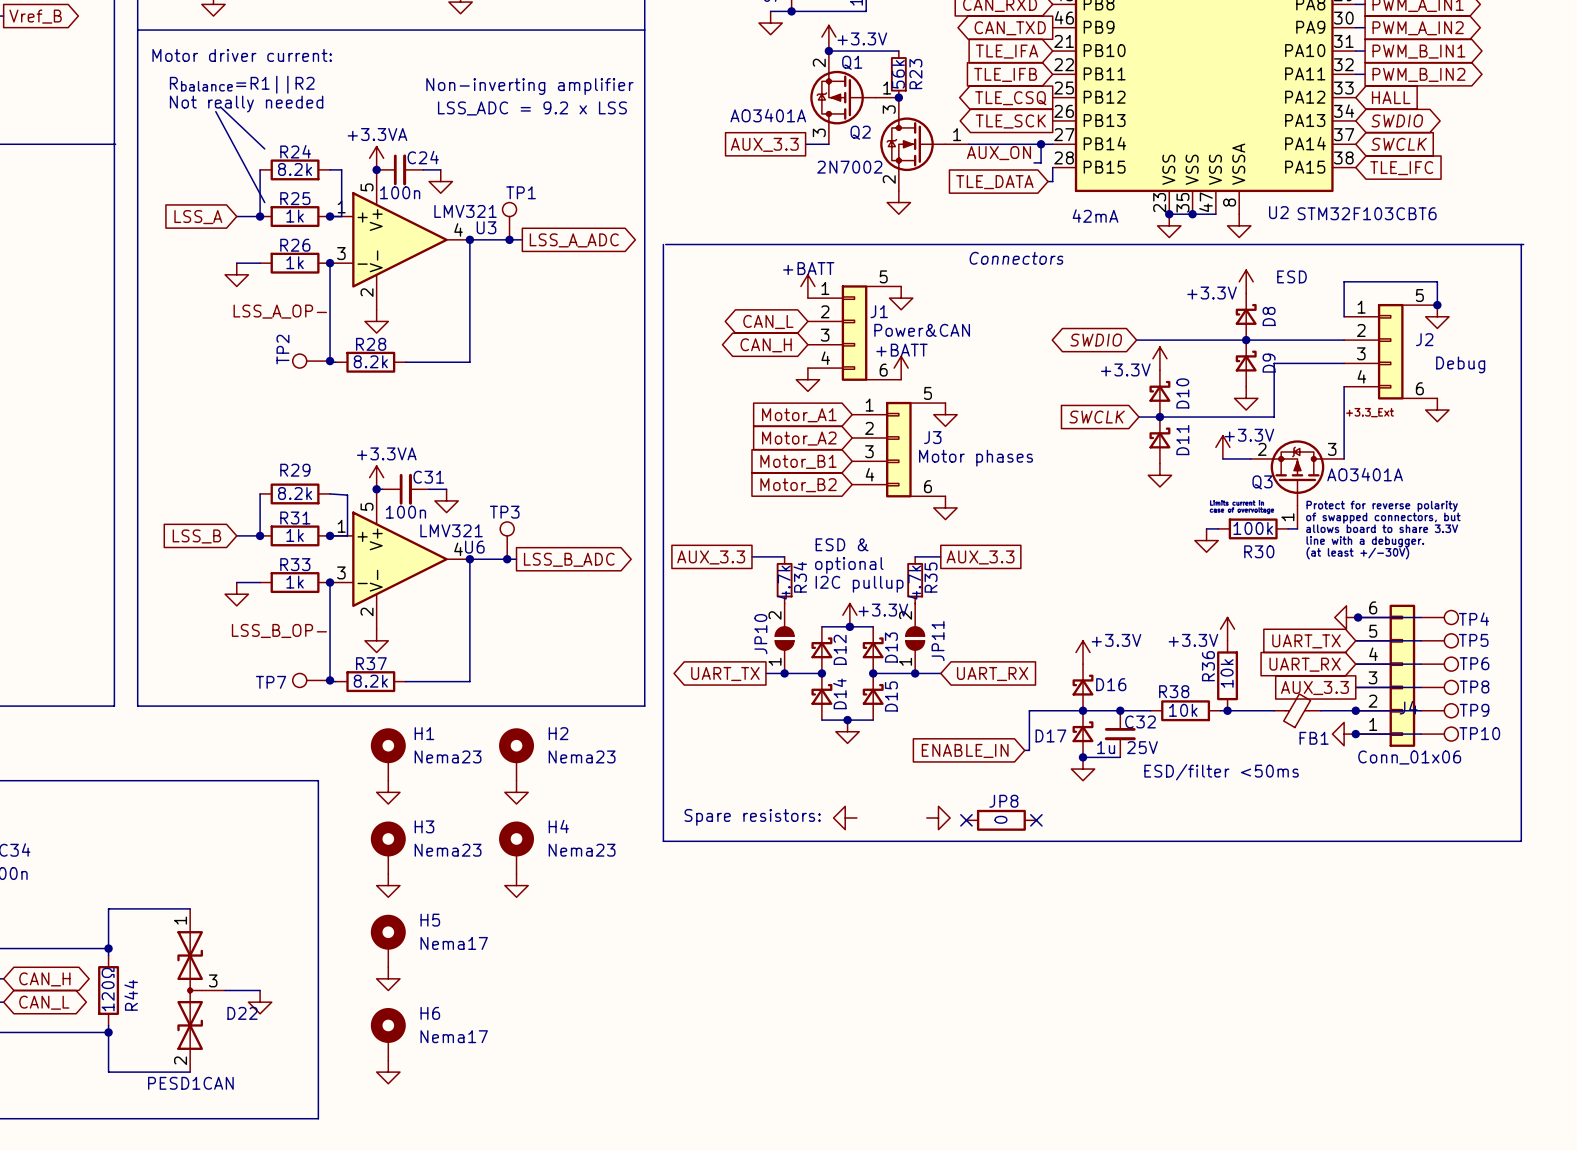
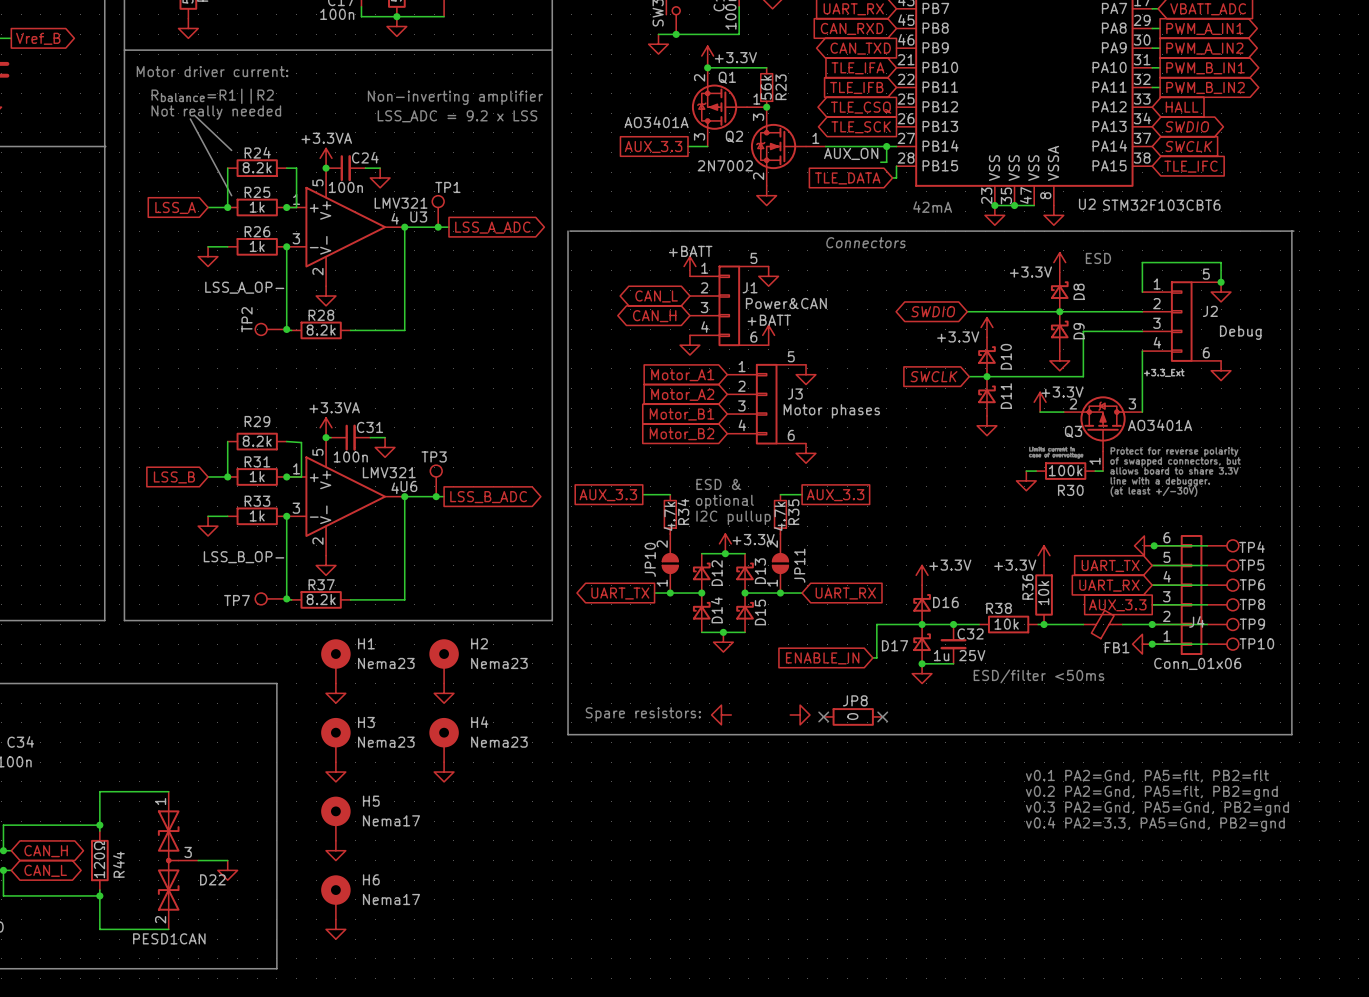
text: none -> v0.1 PA2=Gnd, PA5=flt, PB2=flt (1147, 776)
text: none -> v0.2 PA2=Gnd, PA5=flt, PB2=gnd (1151, 792)
text: none -> v0.3 PA2=Gnd, PA5=Gnd, PB2=gnd (1157, 808)
text: none -> v0.4 PA2=3.3, PA5=Gnd, PB2=gnd (1155, 824)

